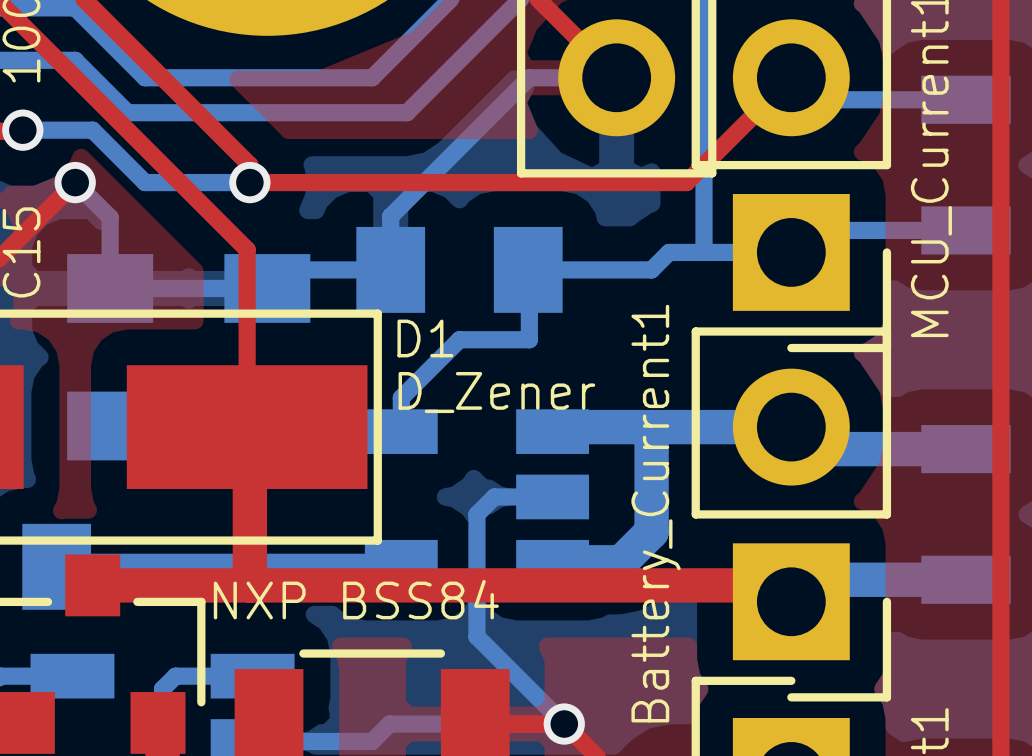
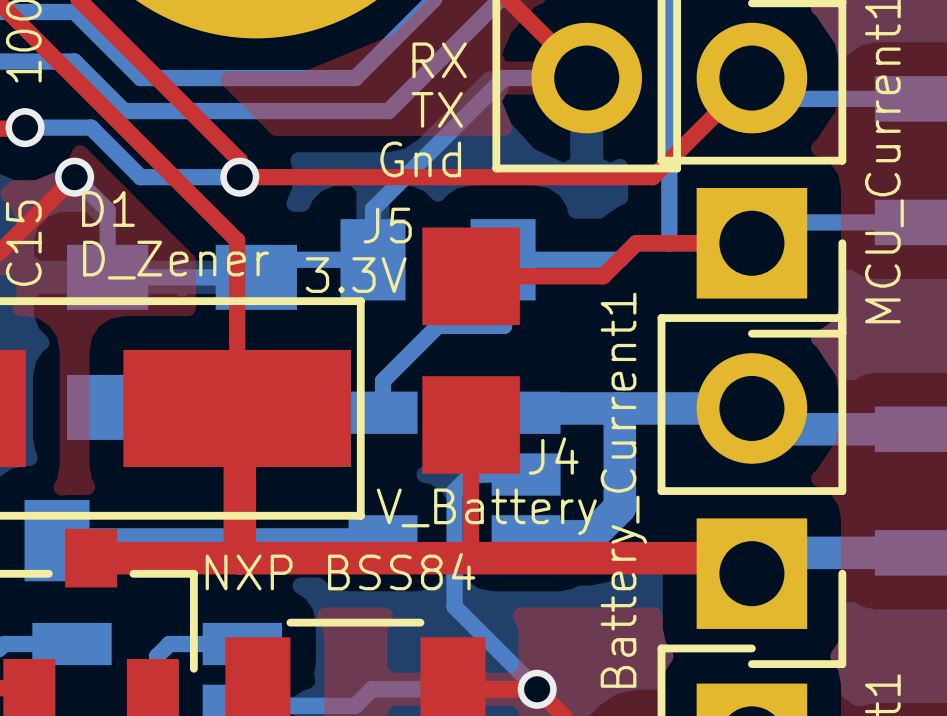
text: none -> RX (439, 60)
text: none -> TX (437, 109)
text: none -> Gnd (420, 159)
top track: none -> (751, 243) (636, 243) (603, 276) (471, 276)
J5: none -> 3.3V (471, 276)
D1 name position: D1 (425, 338) -> D1 (108, 209)
D1 value position: D_Zener (496, 392) -> D_Zener (176, 260)
top track: none -> (471, 424) (471, 558)
J4: none -> V_Battery (471, 424)

